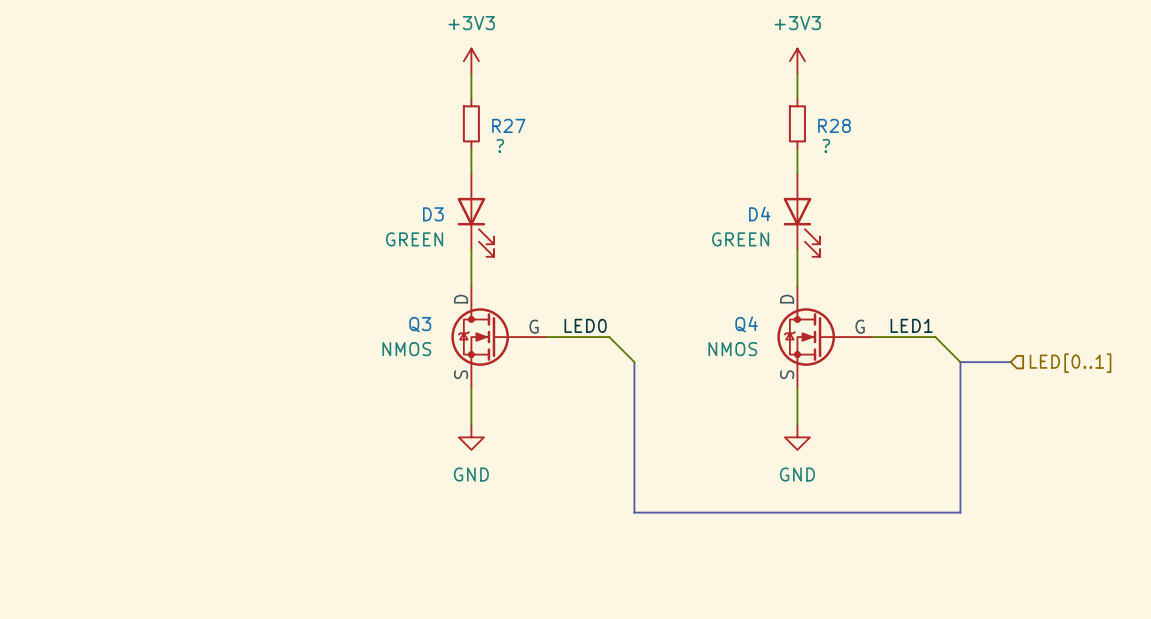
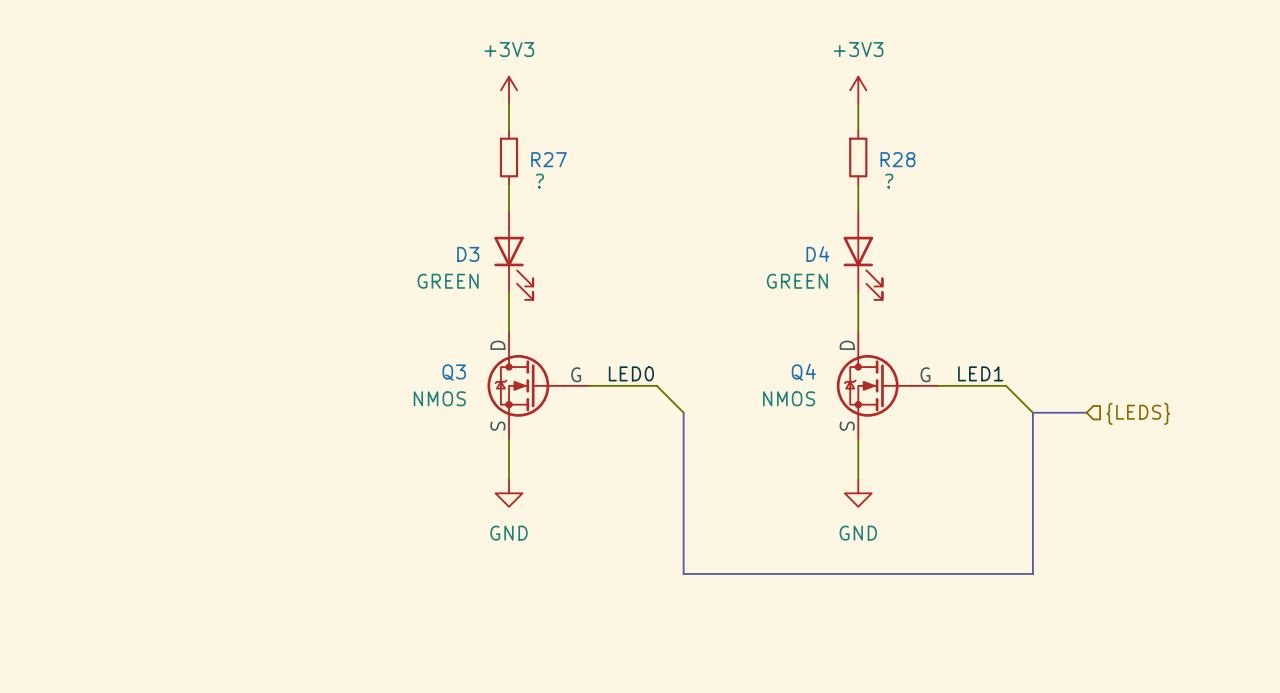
hierarchical label: LED[0..1] (1070, 363) -> {LEDS} (1138, 413)

